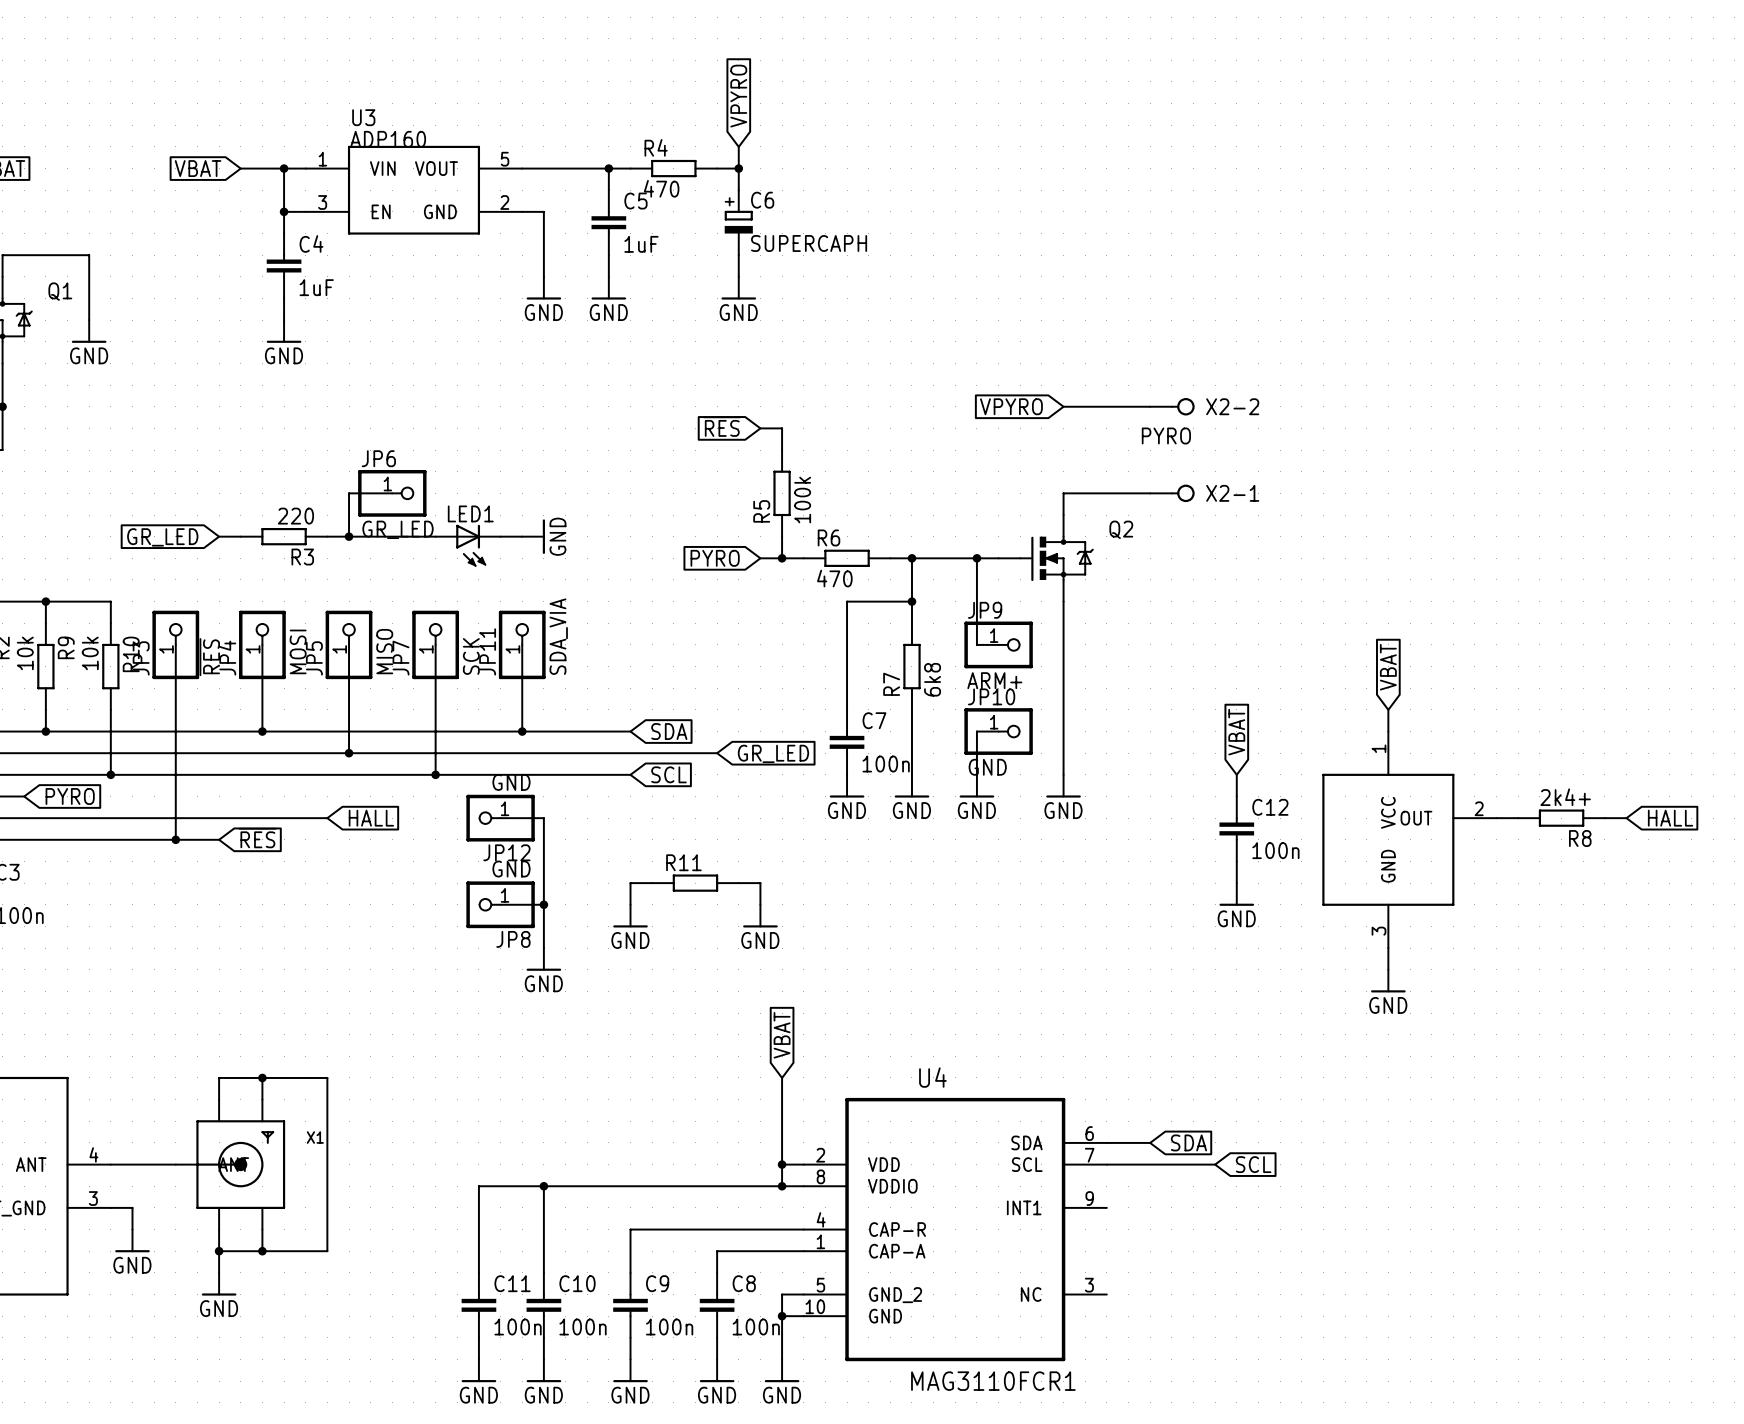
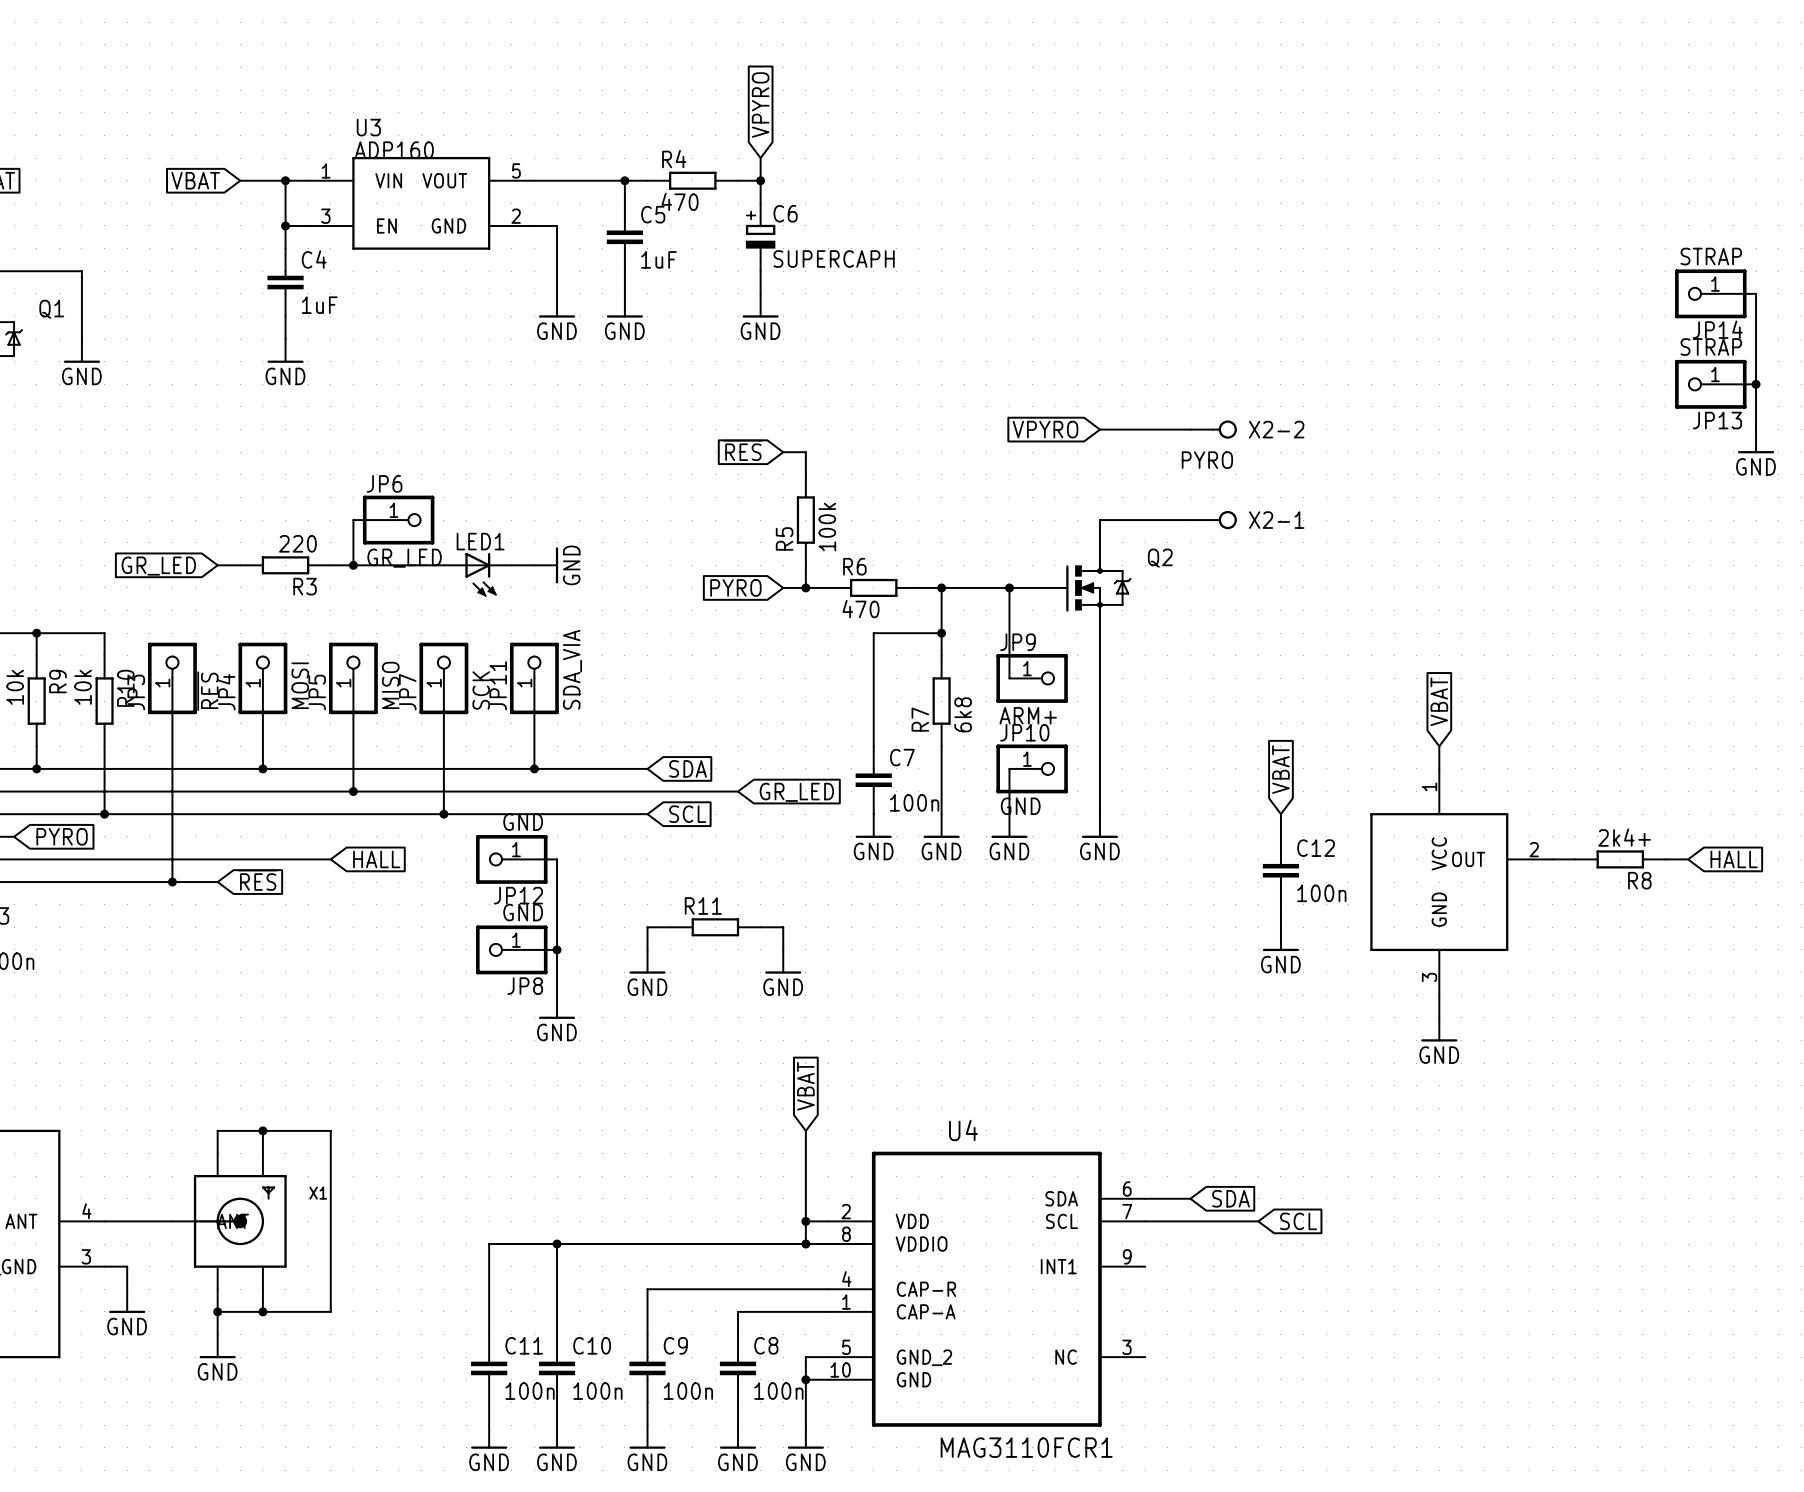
wire: none -> (1710, 293) (1756, 293) (1756, 429)
JP14: none -> STRAP (1710, 293)
wire: none -> (1710, 384) (1756, 384)
JP13: none -> STRAP (1710, 384)
junction: none -> (1756, 384)
power symbol: none -> GND (1756, 441)

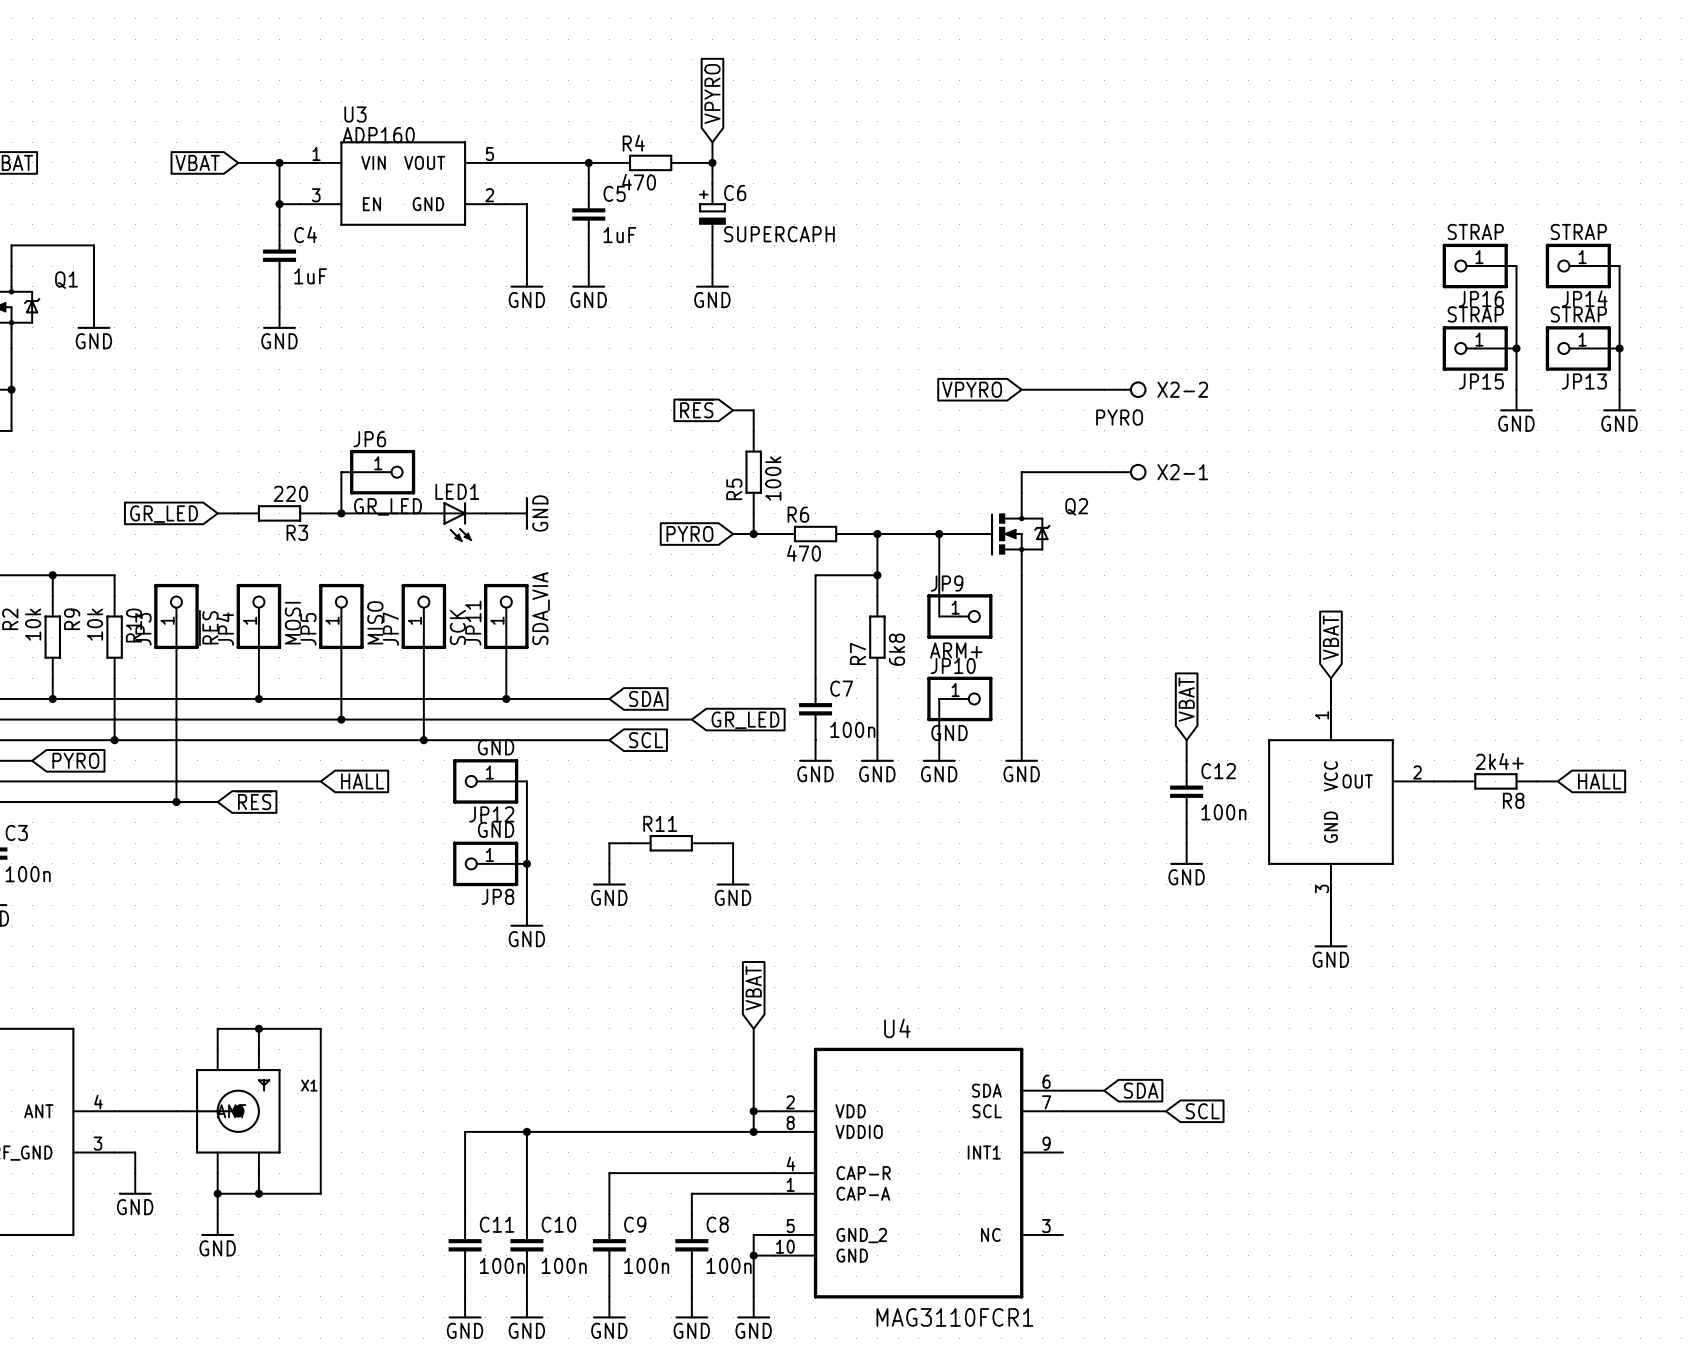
wire: none -> (1475, 266) (1516, 266) (1516, 389)
JP16: none -> STRAP (1475, 266)
wire: none -> (1475, 348) (1516, 348)
JP15: none -> STRAP (1475, 348)
junction: none -> (1516, 348)
power symbol: none -> GND (1516, 400)

